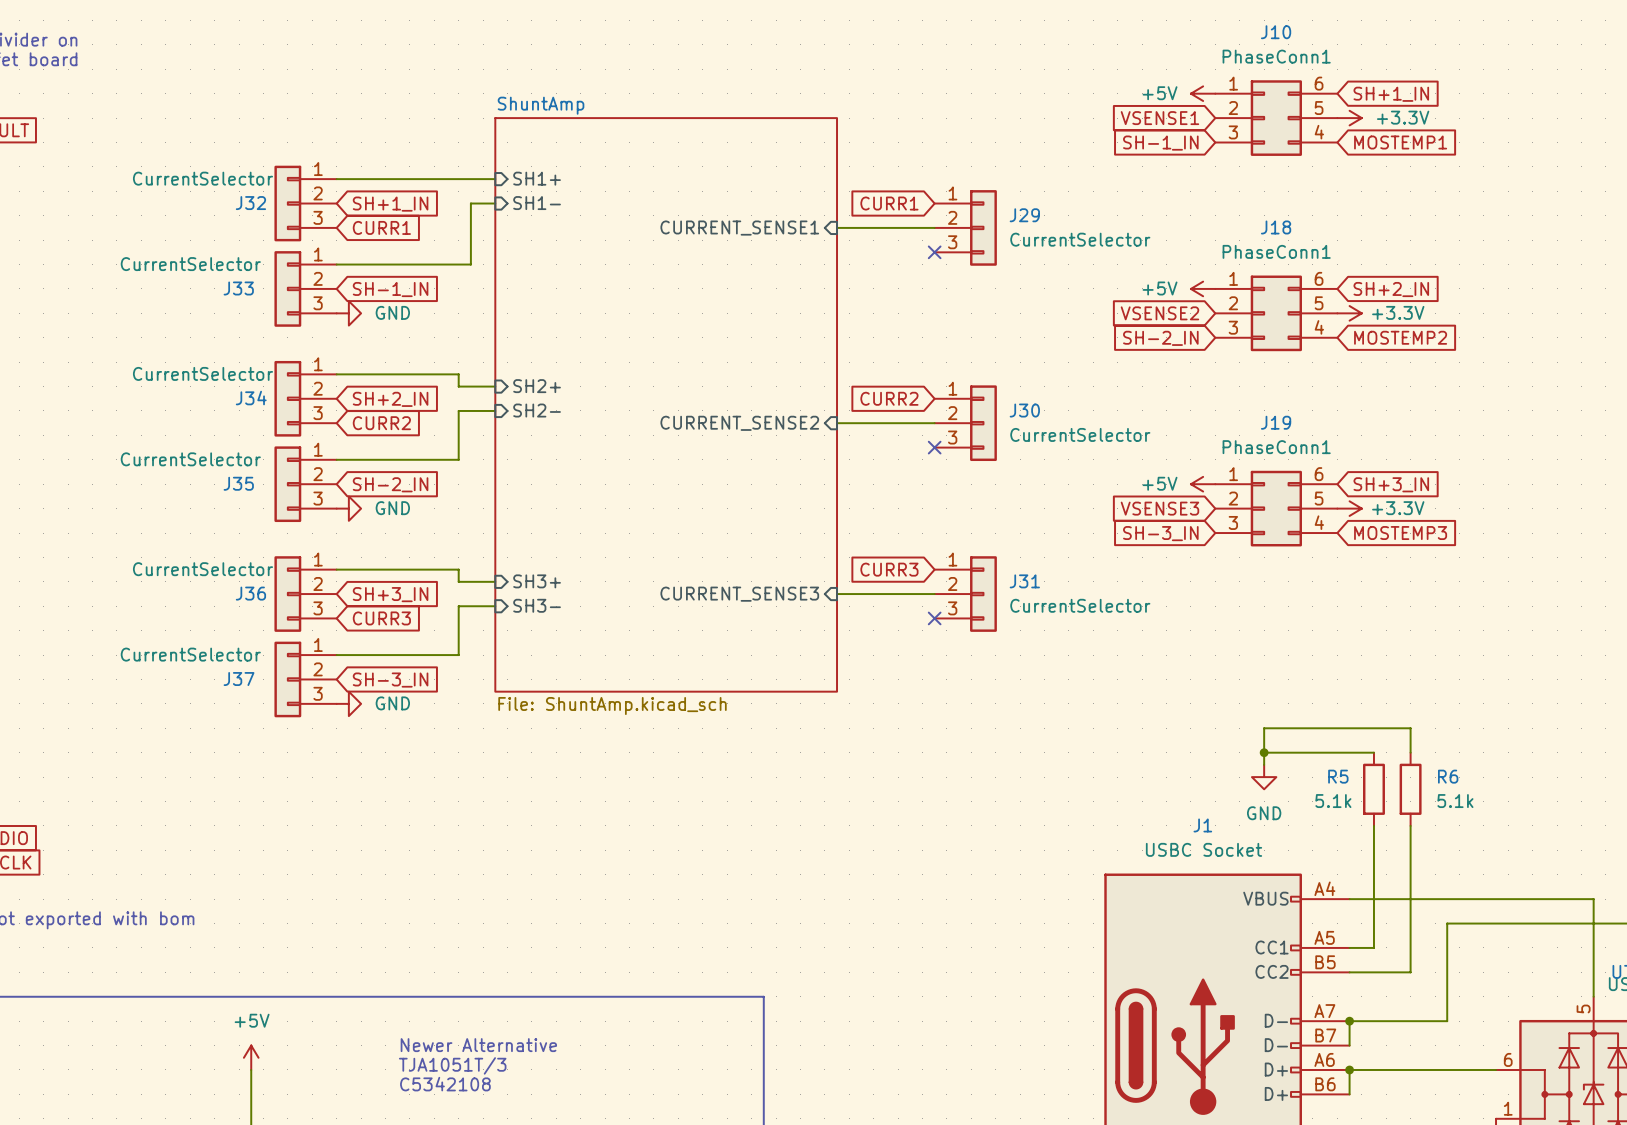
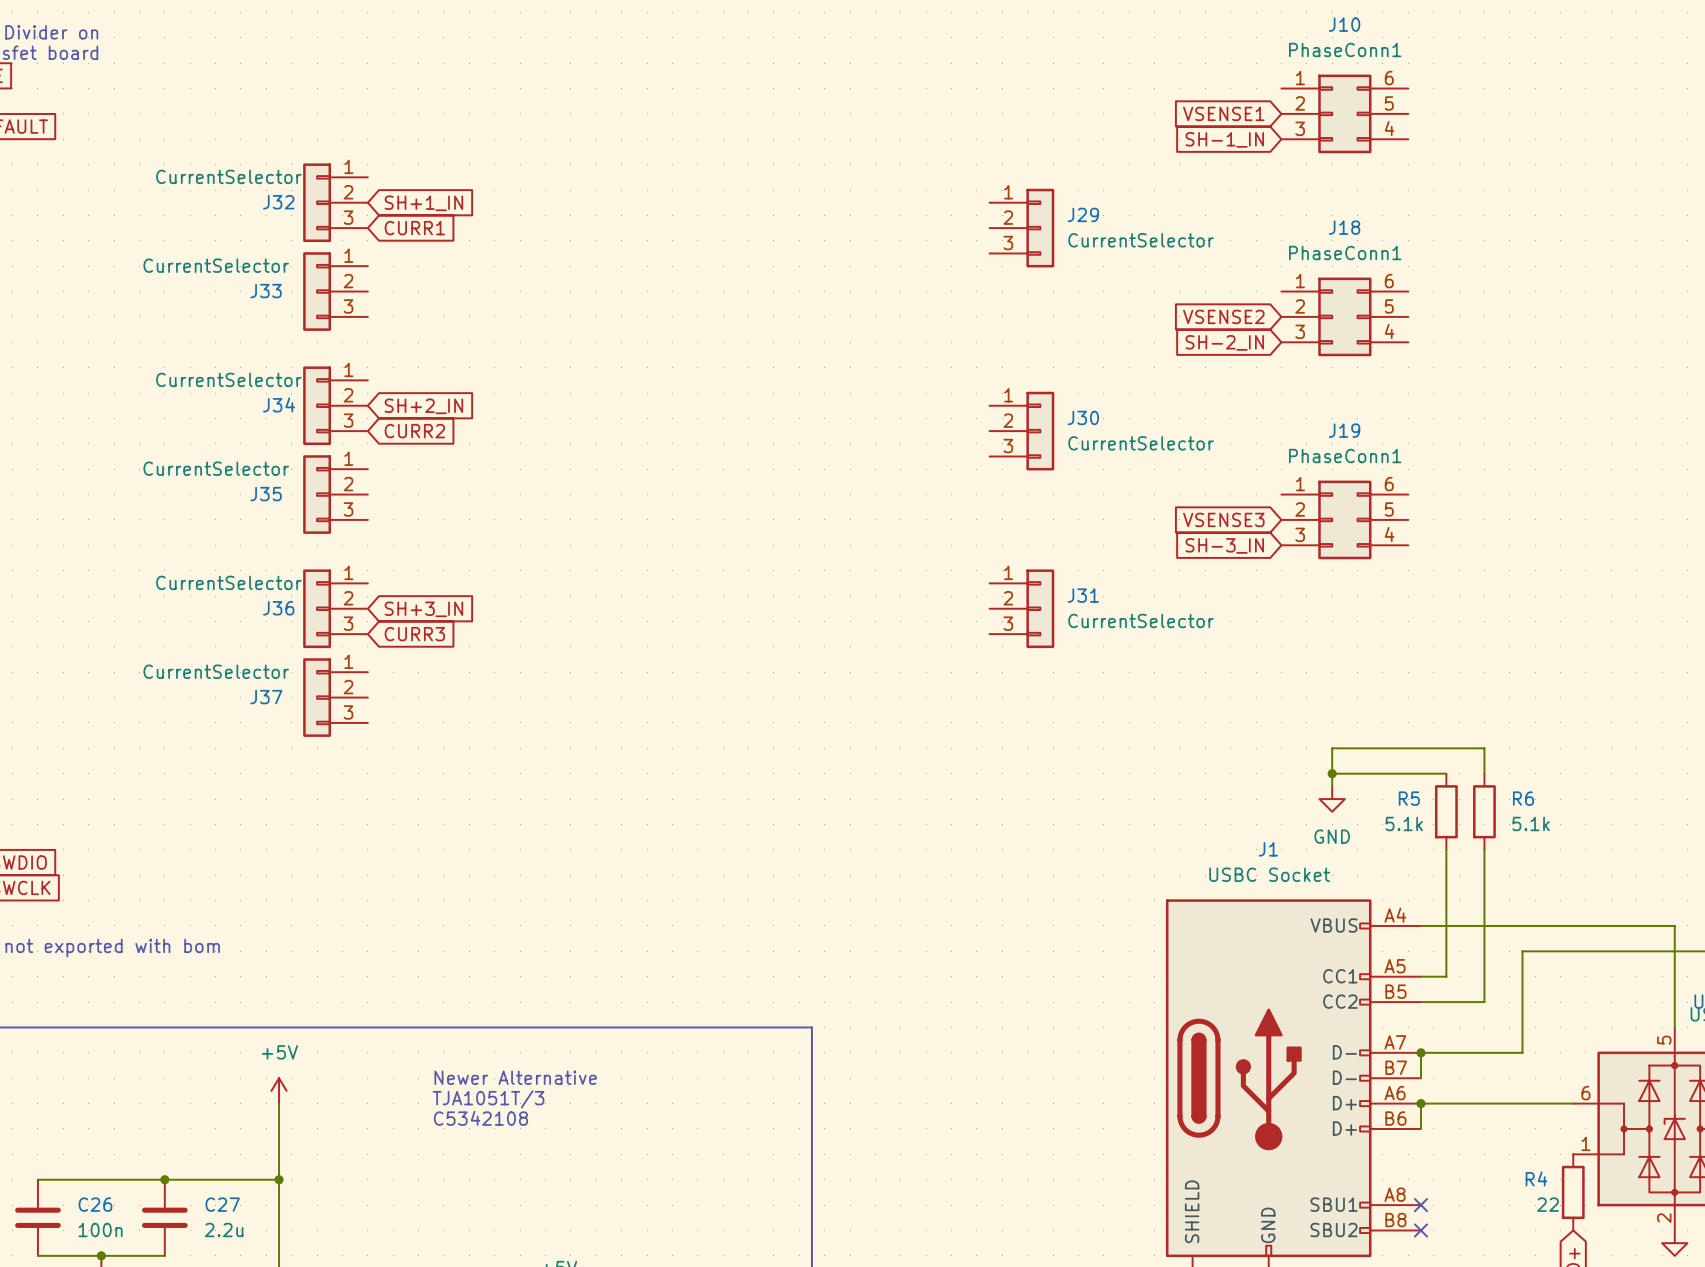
power symbol: +5V (1203, 93) -> none
global label: SH+1_IN (1391, 94) -> none
power symbol: +3.3V (1349, 118) -> none
global label: MOSTEMP1 (1400, 142) -> none
sheet pin: SH1+ (537, 178) -> none
wire: (336, 179) (495, 179) -> none
wire: (495, 203) (470, 203) (470, 264) (336, 264) -> none
sheet pin: SH1- (537, 203) -> none
global label: CURR1 (889, 203) -> none
wire: (837, 227) (934, 227) -> none
sheet pin: CURRENT_SENSE1 (739, 228) -> none
no-connect mark: (934, 252) -> none
power symbol: +5V (1203, 288) -> none
global label: SH-1_IN (390, 289) -> none
global label: SH+2_IN (1391, 289) -> none
power symbol: GND (348, 313) -> none
power symbol: +3.3V (1349, 313) -> none
global label: MOSTEMP2 (1400, 337) -> none
wire: (336, 374) (458, 374) (458, 386) (495, 386) -> none
sheet pin: SH2+ (537, 386) -> none
global label: CURR2 (889, 398) -> none
sheet ShuntAmp: File: ShuntAmp.kicad_sch (666, 404) -> none
wire: (495, 410) (458, 410) (458, 459) (336, 459) -> none
sheet pin: SH2- (537, 410) -> none
sheet pin: CURRENT_SENSE2 (739, 423) -> none
wire: (837, 423) (934, 423) -> none
no-connect mark: (934, 447) -> none
global label: SH-2_IN (390, 484) -> none
power symbol: +5V (1203, 484) -> none
global label: SH+3_IN (1391, 484) -> none
power symbol: GND (348, 508) -> none
power symbol: +3.3V (1349, 508) -> none
global label: MOSTEMP3 (1400, 533) -> none
wire: (336, 569) (458, 569) (458, 581) (495, 581) -> none
global label: CURR3 (889, 569) -> none
sheet pin: SH3+ (537, 581) -> none
sheet pin: CURRENT_SENSE3 (739, 594) -> none
wire: (837, 594) (934, 594) -> none
sheet pin: SH3- (537, 605) -> none
wire: (495, 606) (458, 606) (458, 655) (336, 655) -> none
no-connect mark: (934, 618) -> none
global label: SH-3_IN (390, 680) -> none
power symbol: GND (348, 703) -> none

